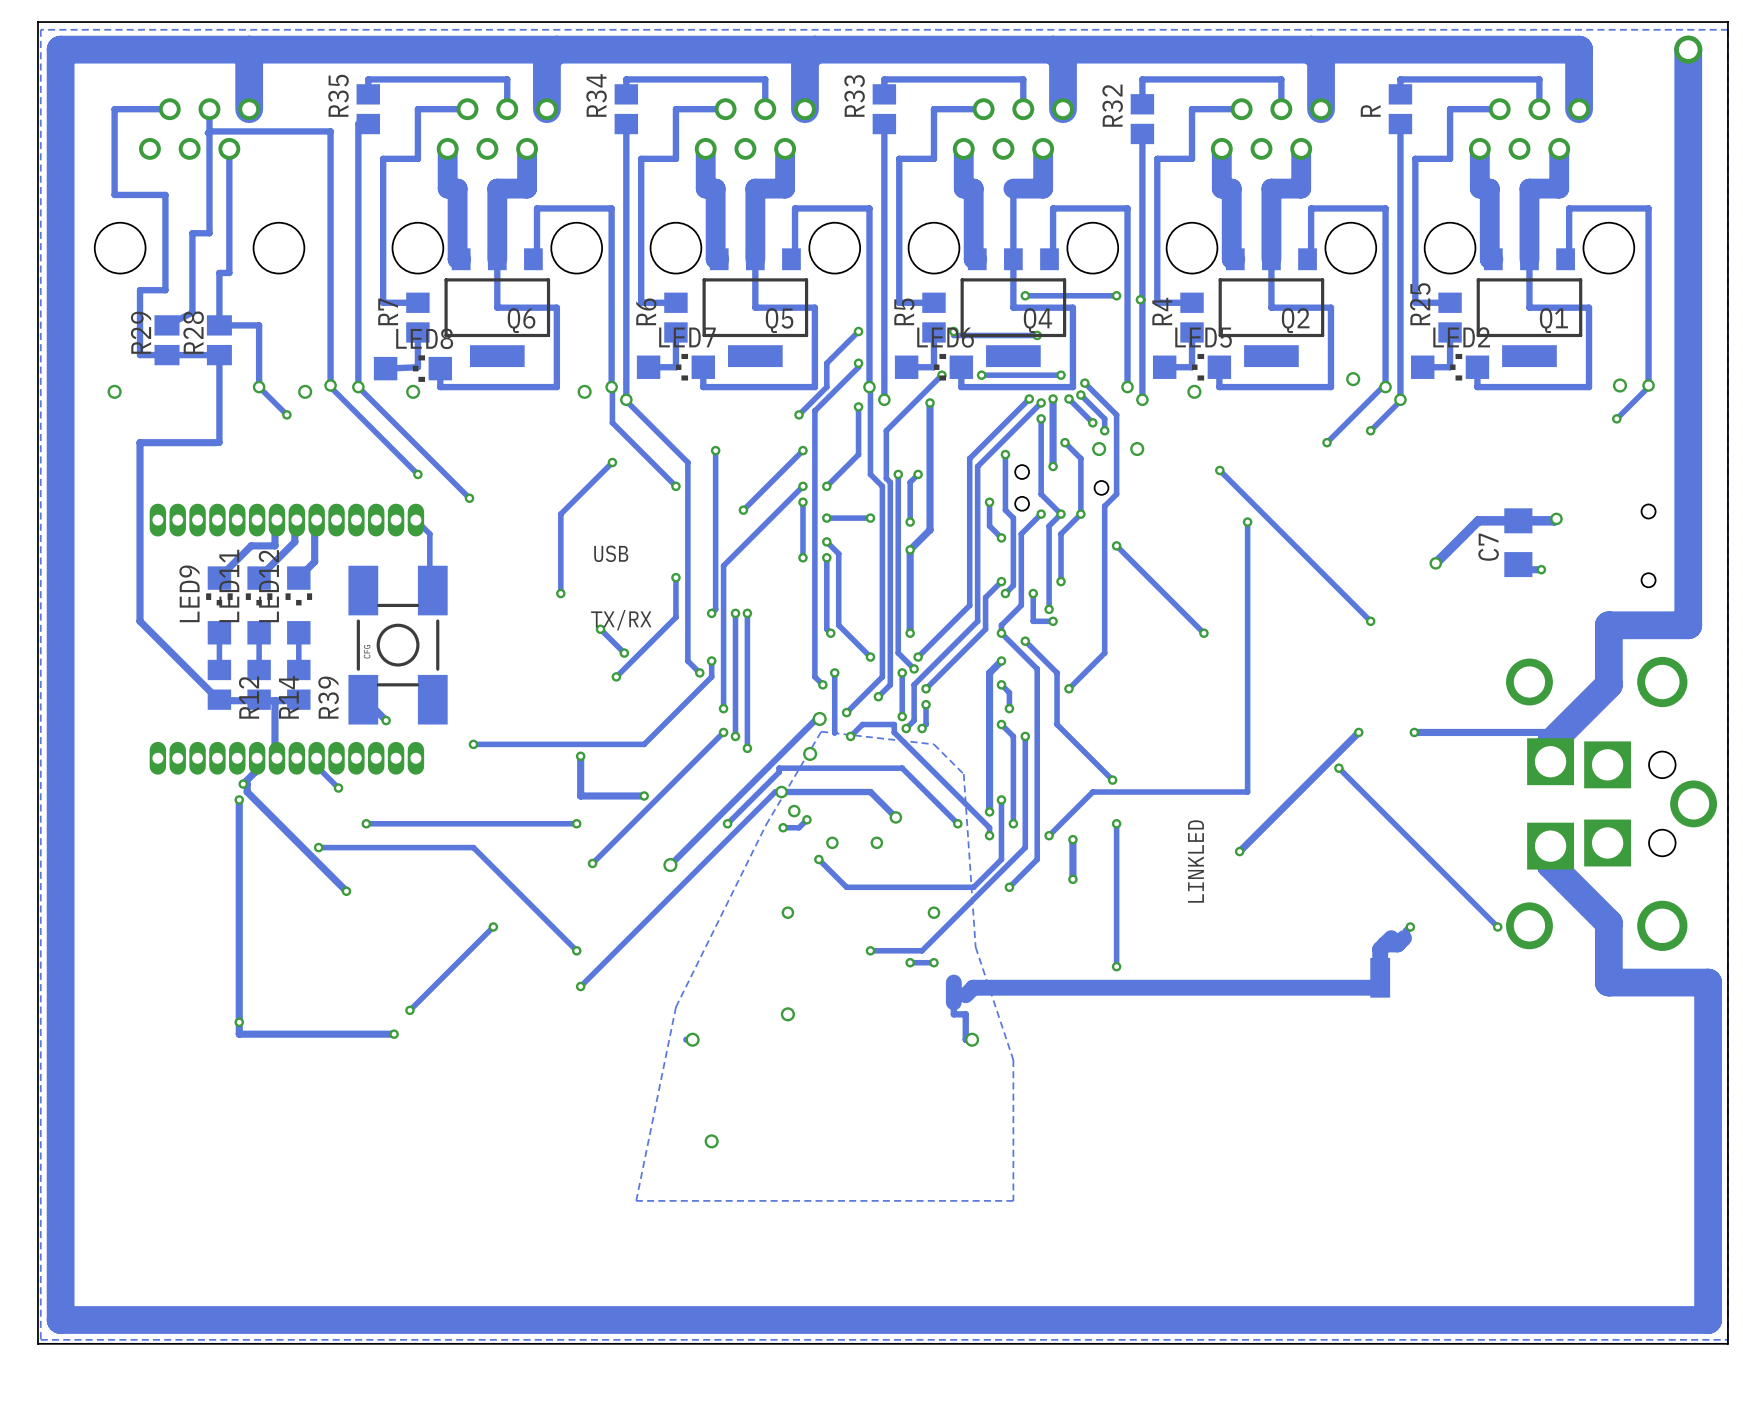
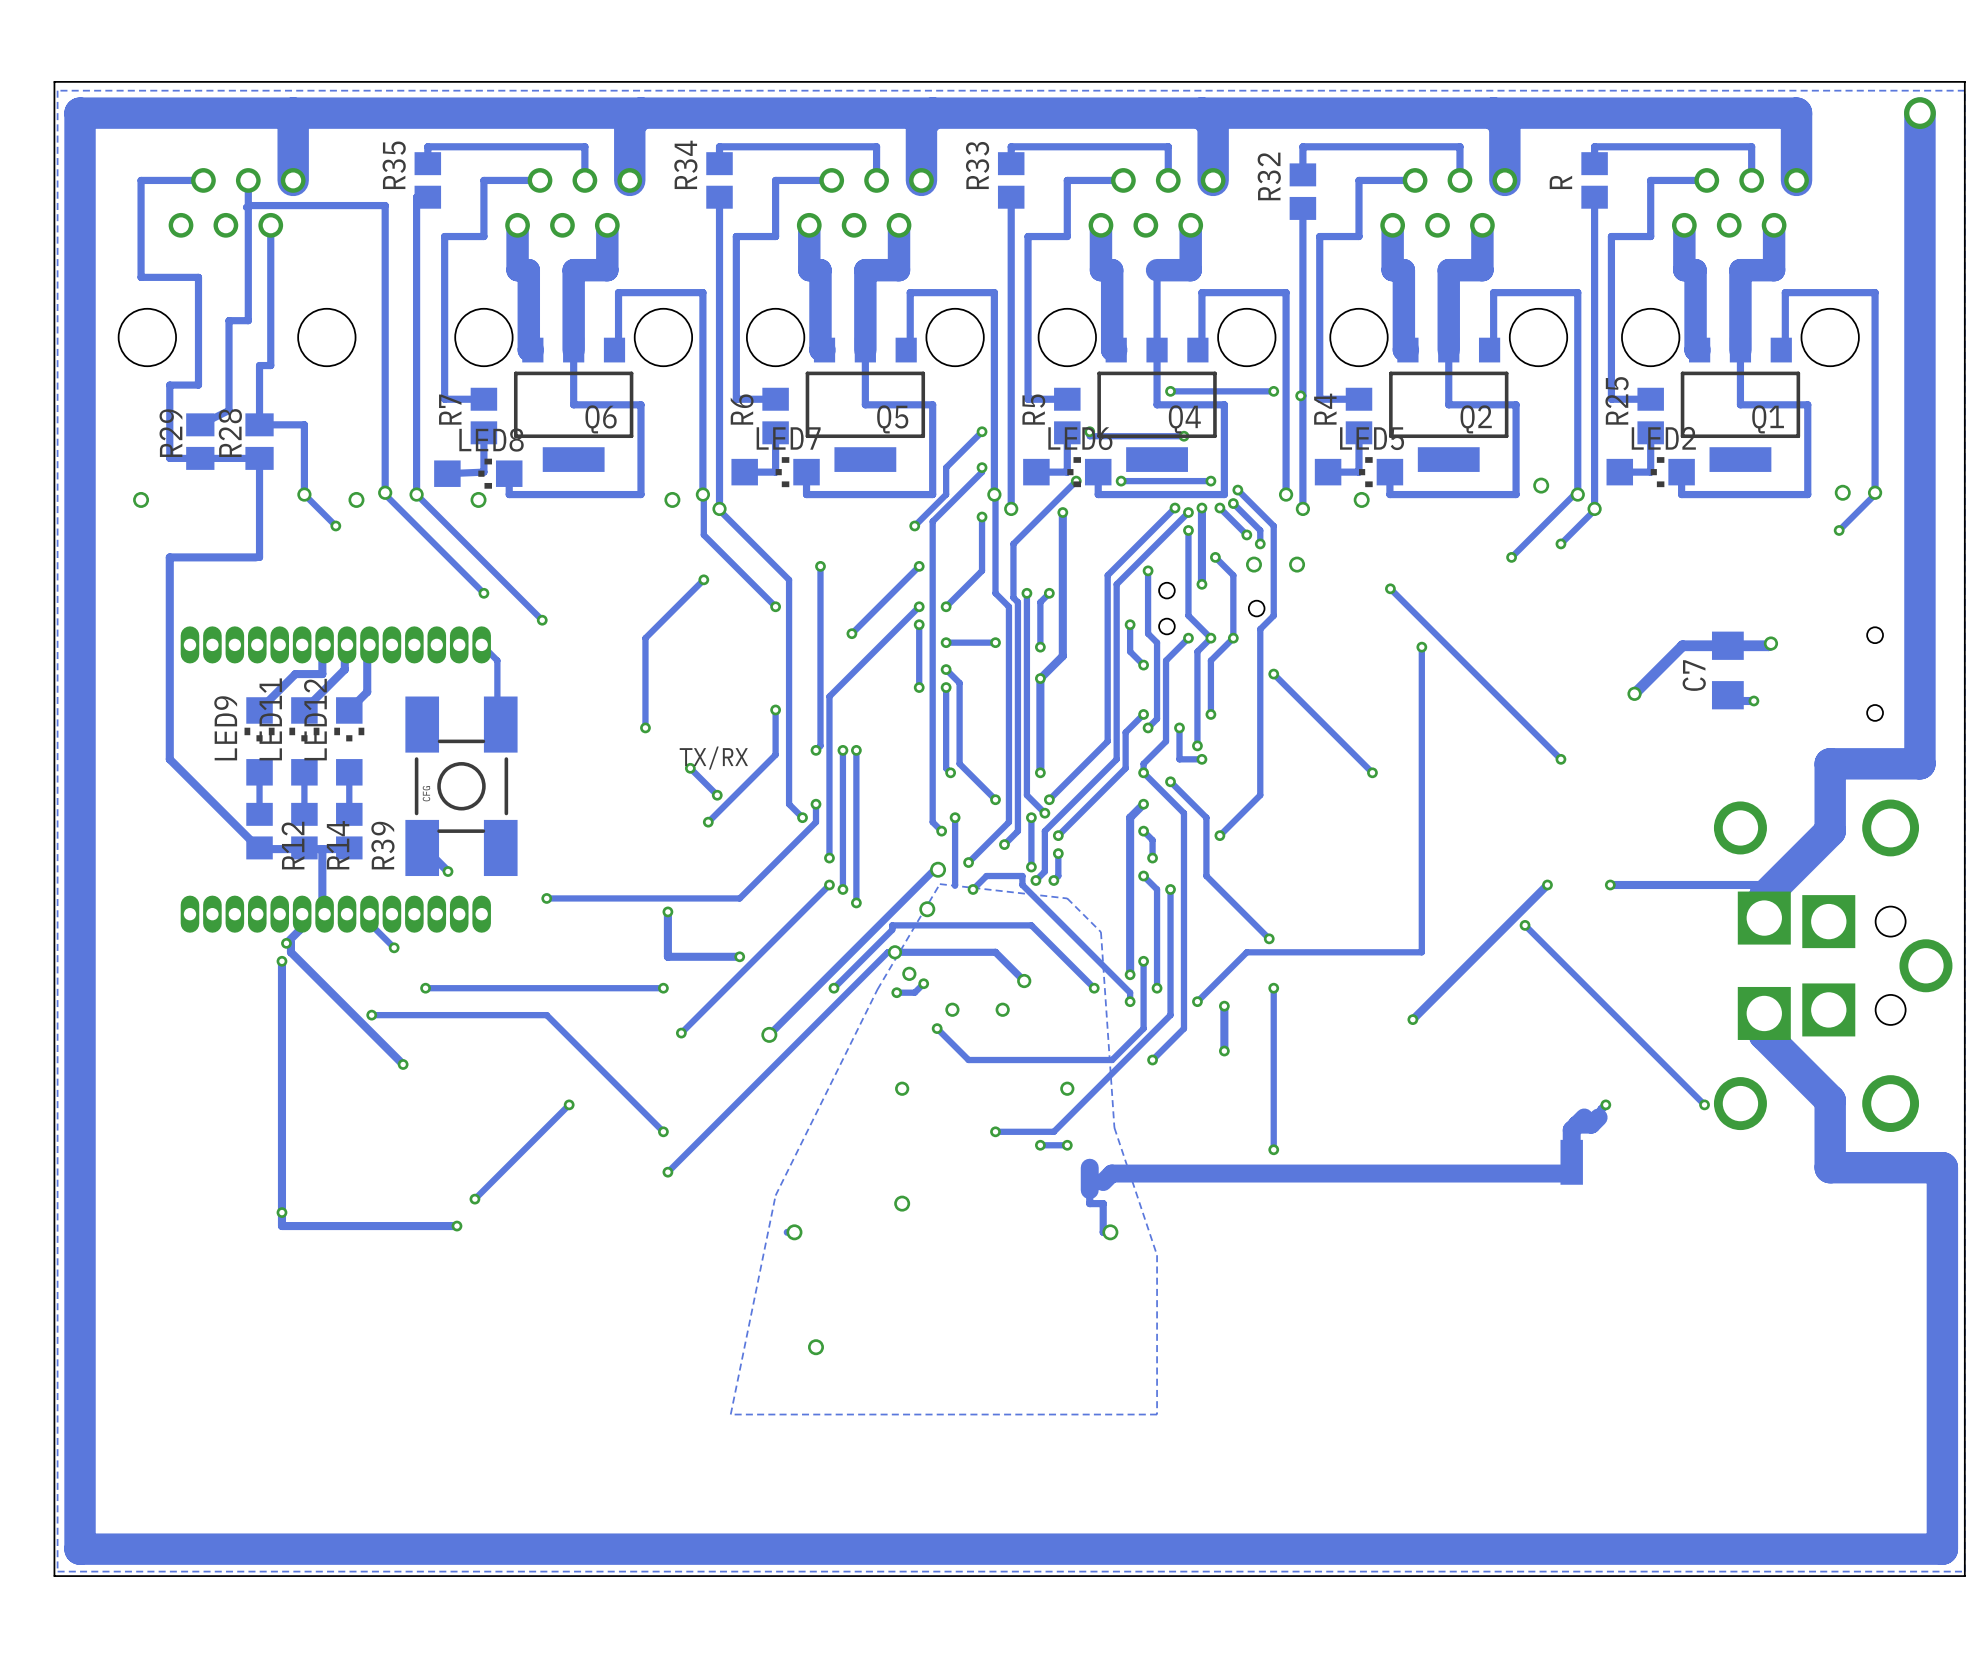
text: USB (611, 553) -> none
text: LINKLED (1195, 861) -> none

